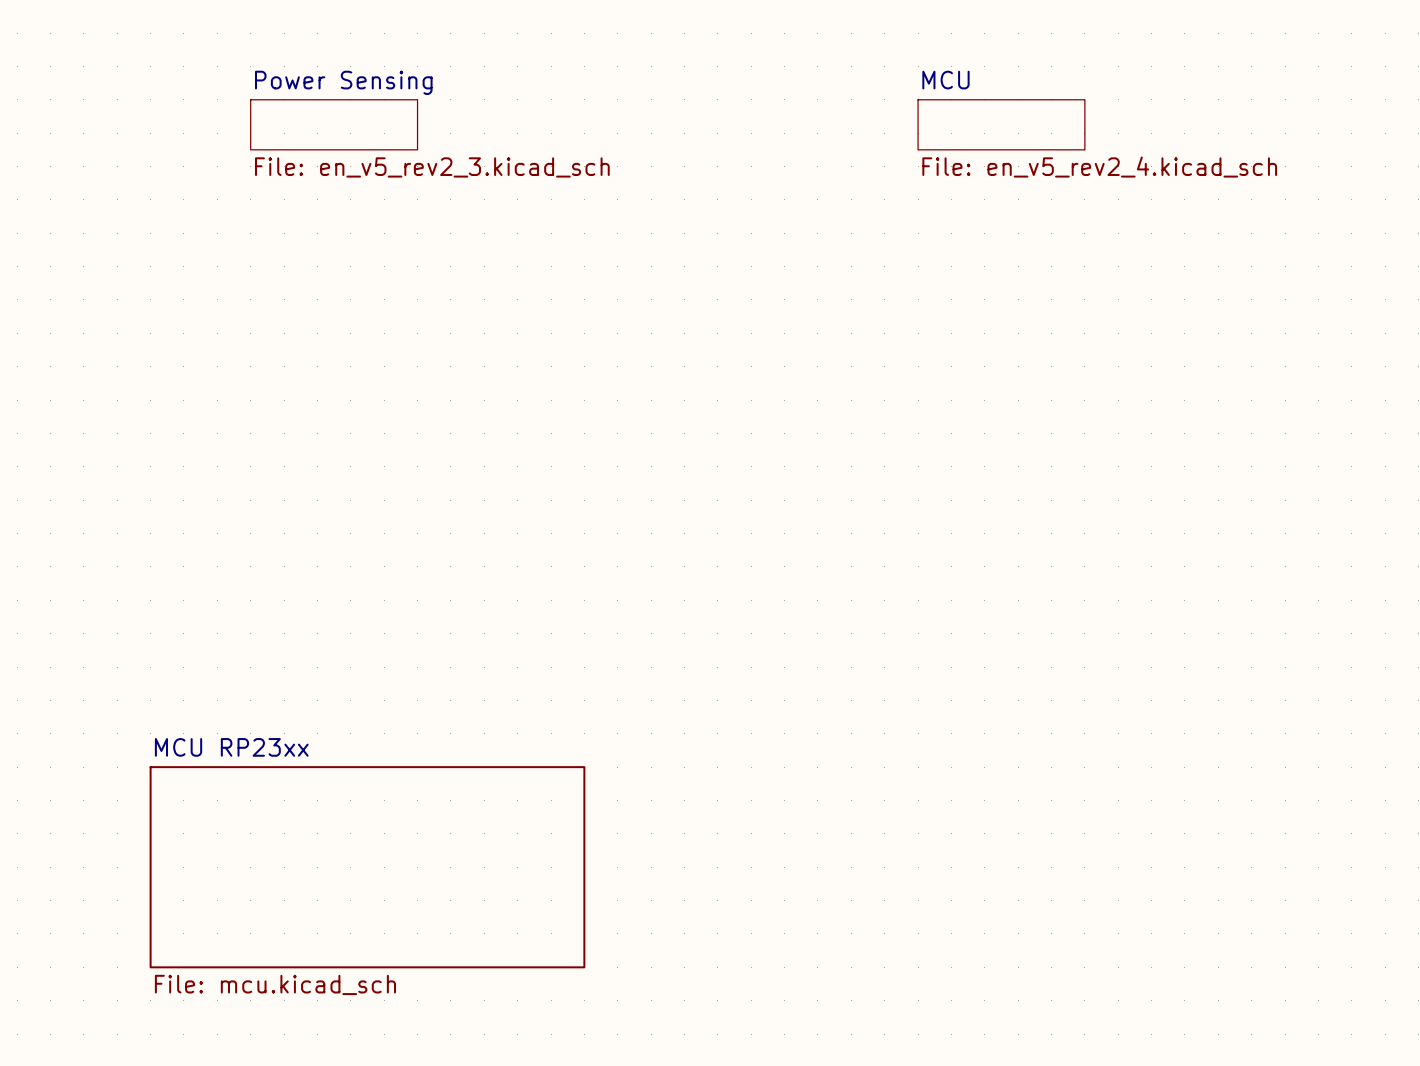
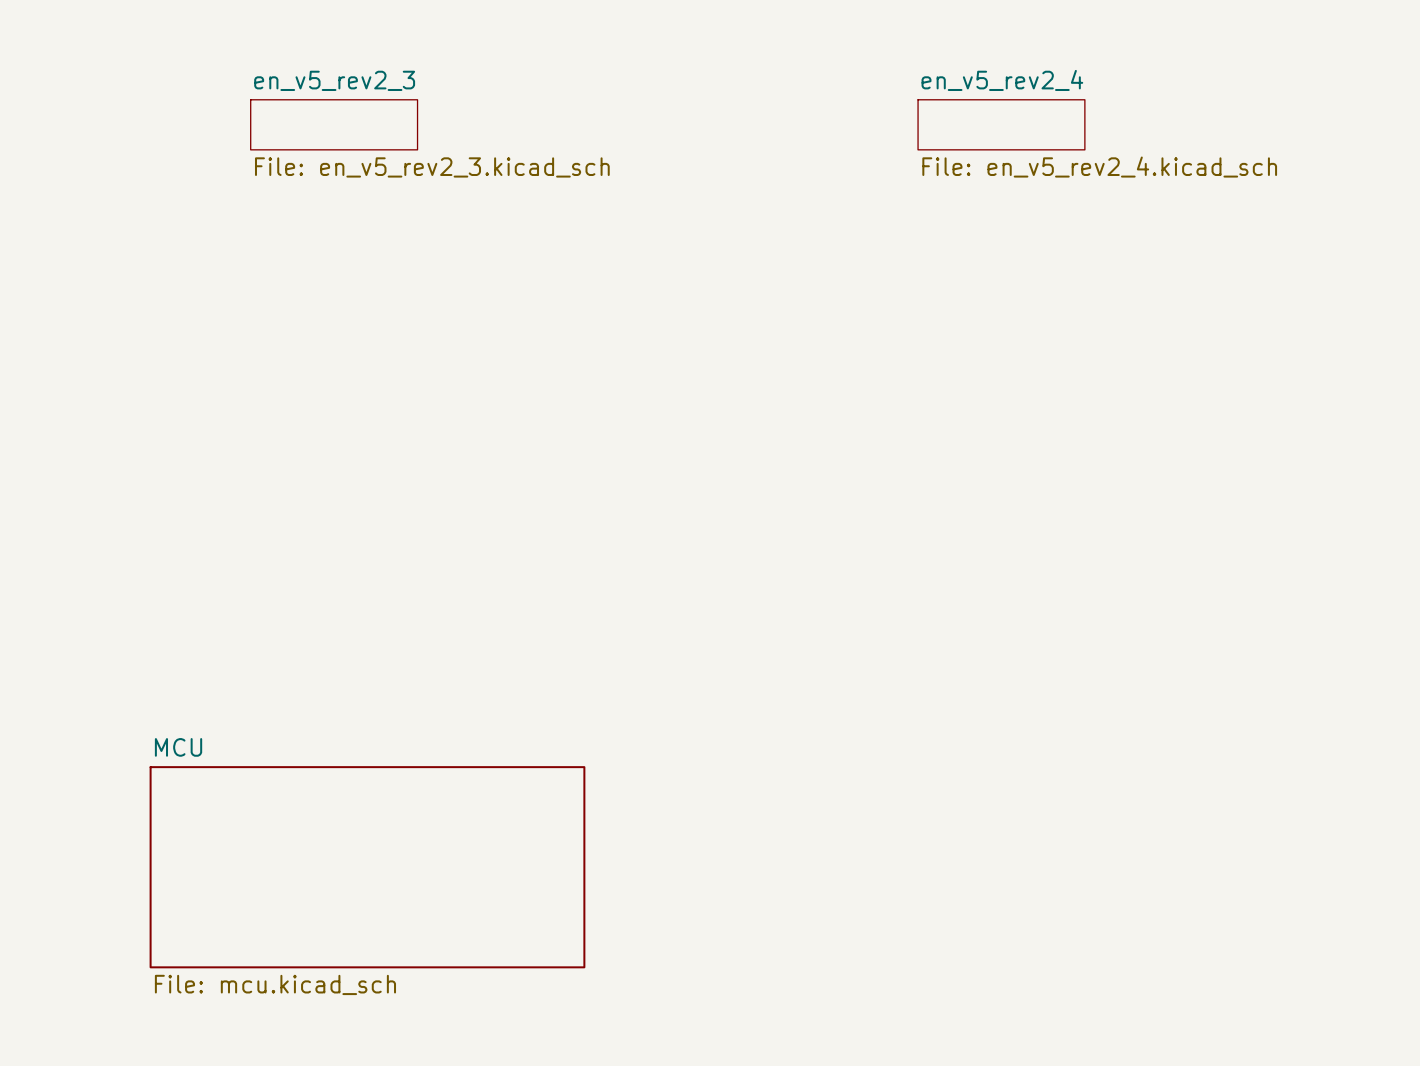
sheet MCU name: MCU (945, 80) -> en_v5_rev2_4 (1002, 80)
sheet Power Sensing name: Power Sensing (343, 82) -> en_v5_rev2_3 (334, 80)
sheet MCU RP23xx name: MCU RP23xx (231, 747) -> MCU (178, 747)

